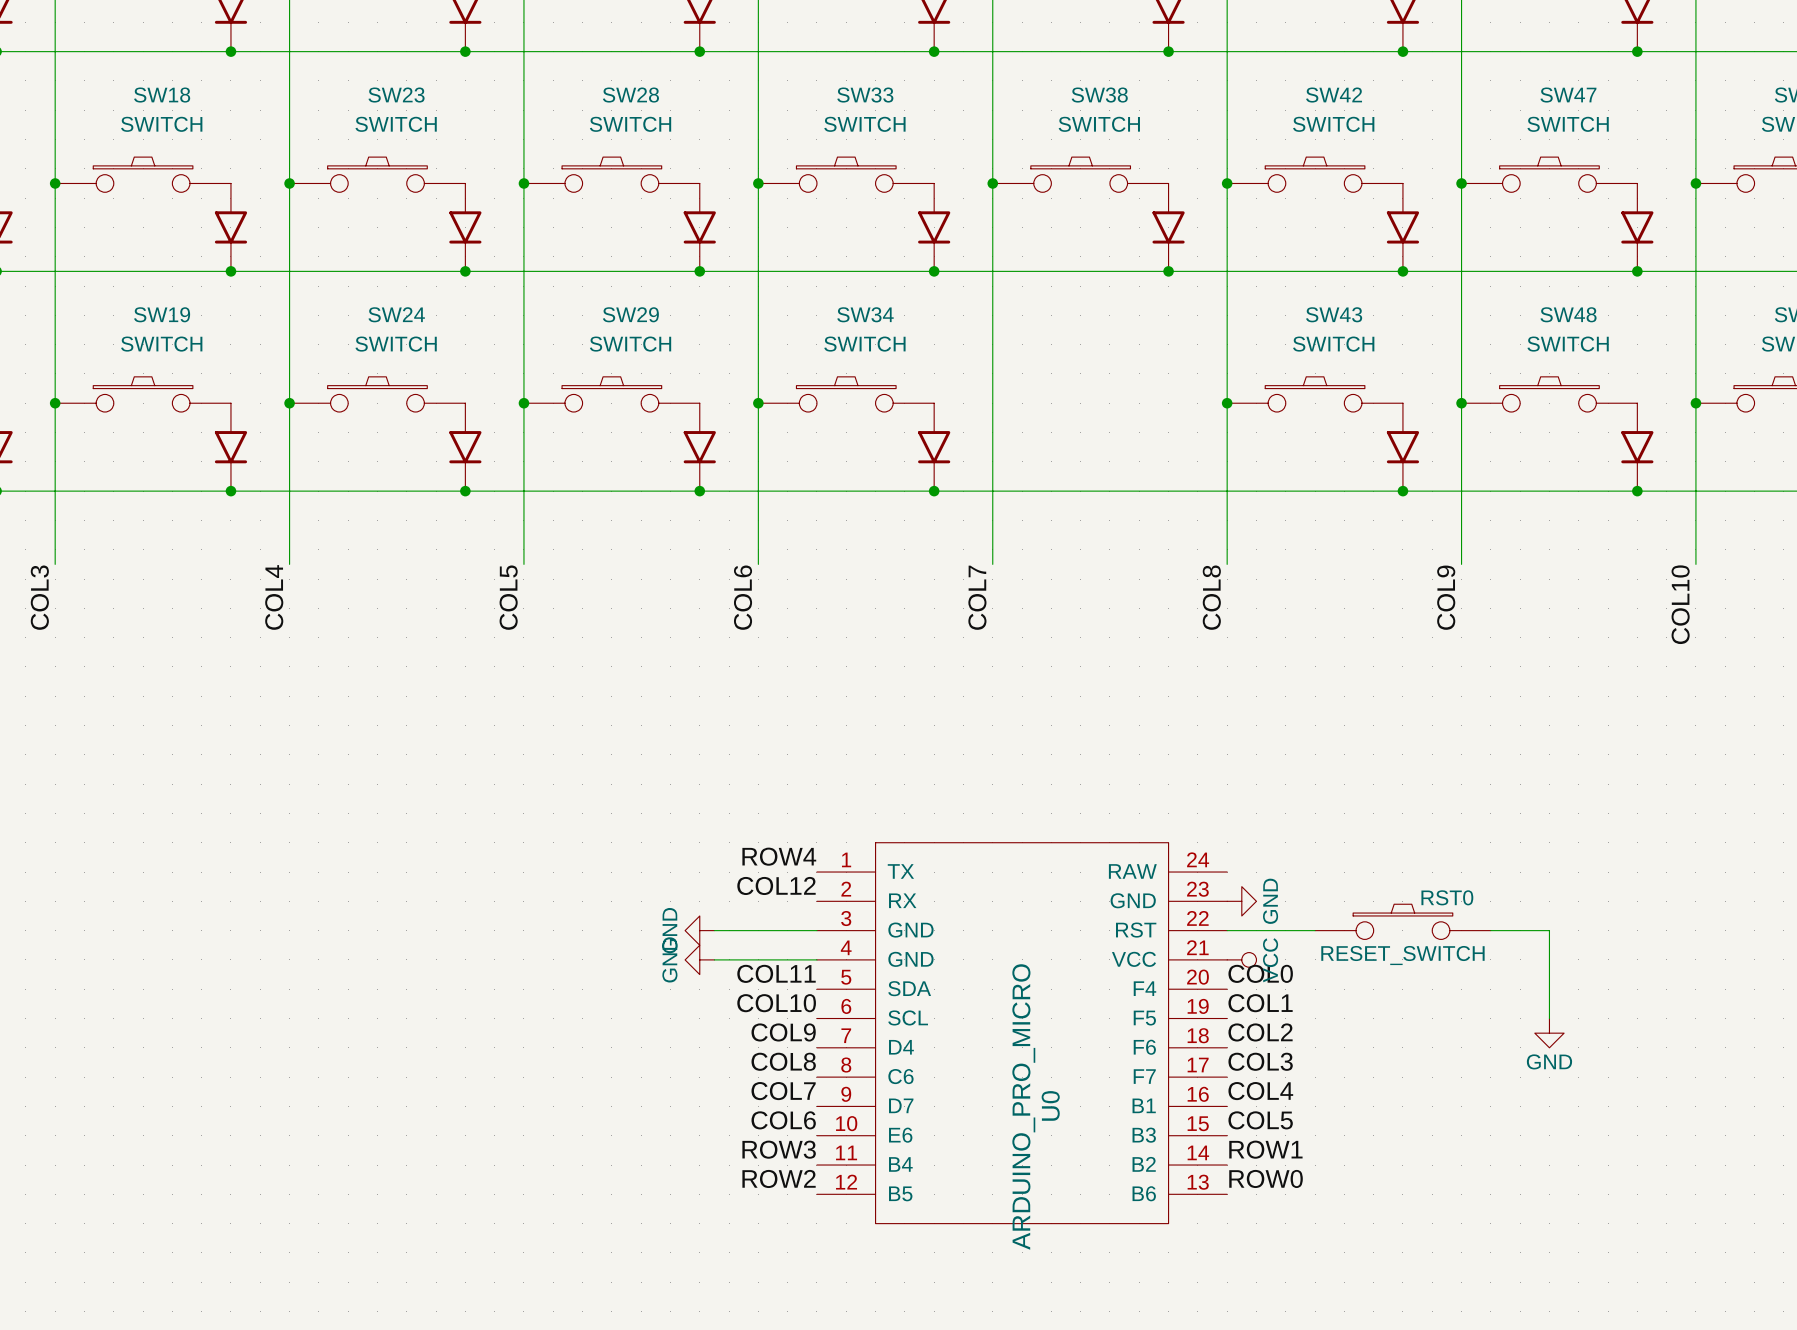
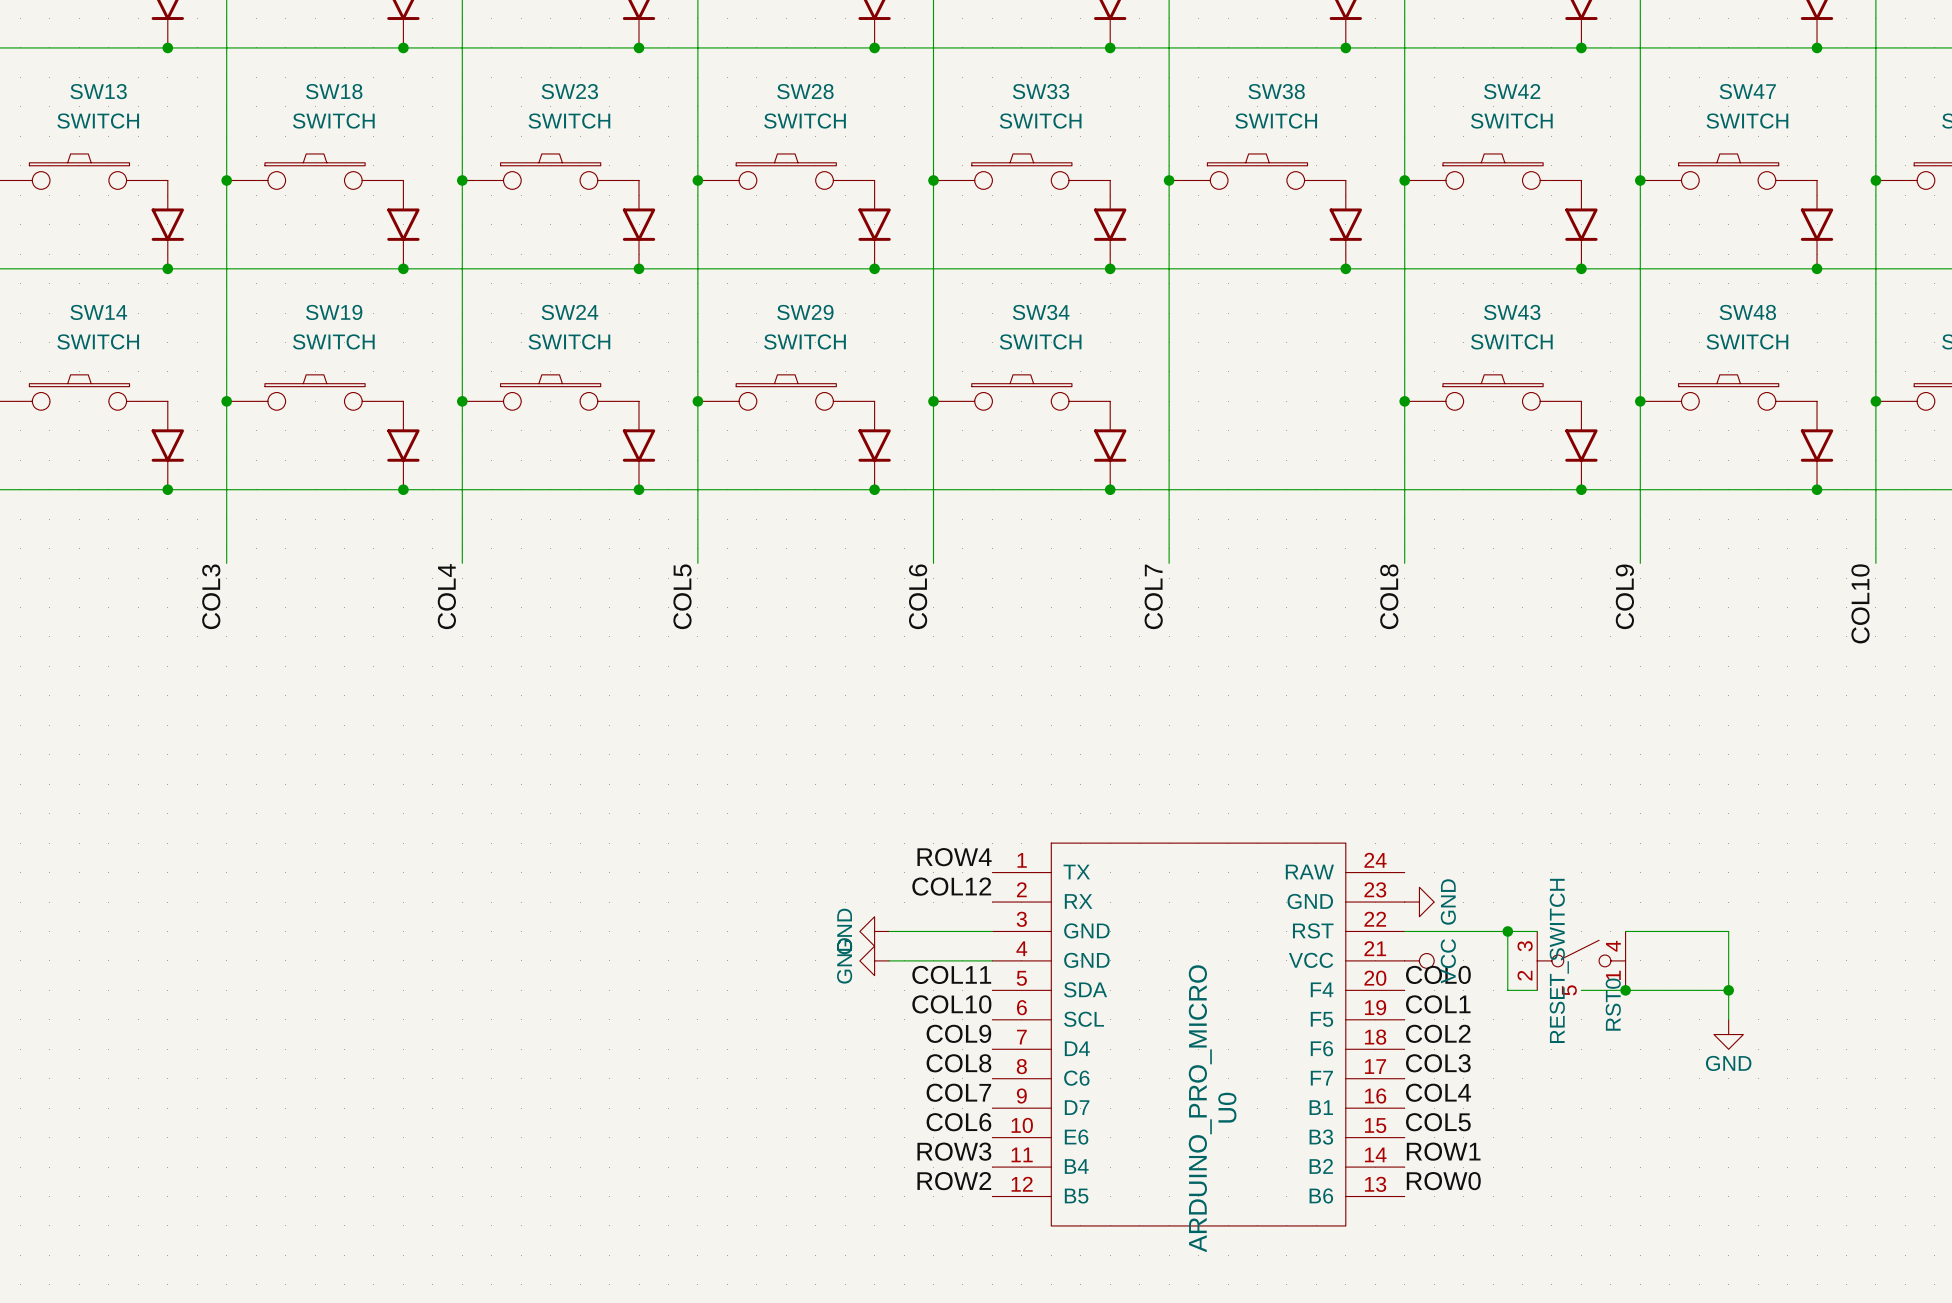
RST0 name position: RST0 (1447, 897) -> RST0 (1613, 1004)
RST0 symbol: [1315, 904, 1491, 940] -> [1537, 931, 1626, 991]
wire: none -> (1507, 931) (1507, 990) (1537, 990)
junction: none -> (1507, 931)
RST0 value position: RESET_SWITCH (1402, 955) -> RESET_SWITCH (1559, 960)
wire: none -> (1581, 990) (1728, 990)
junction: none -> (1625, 990)
junction: none -> (1728, 990)

